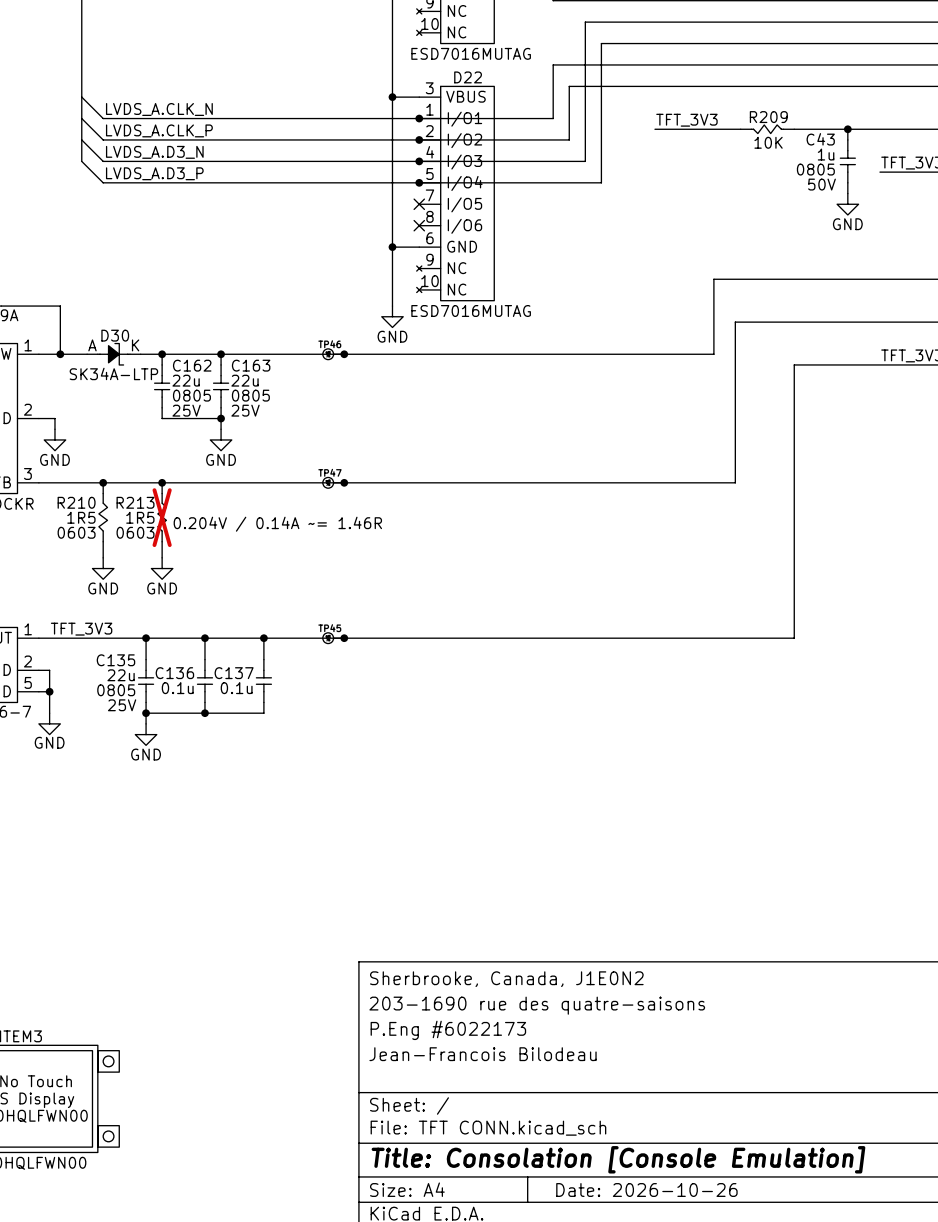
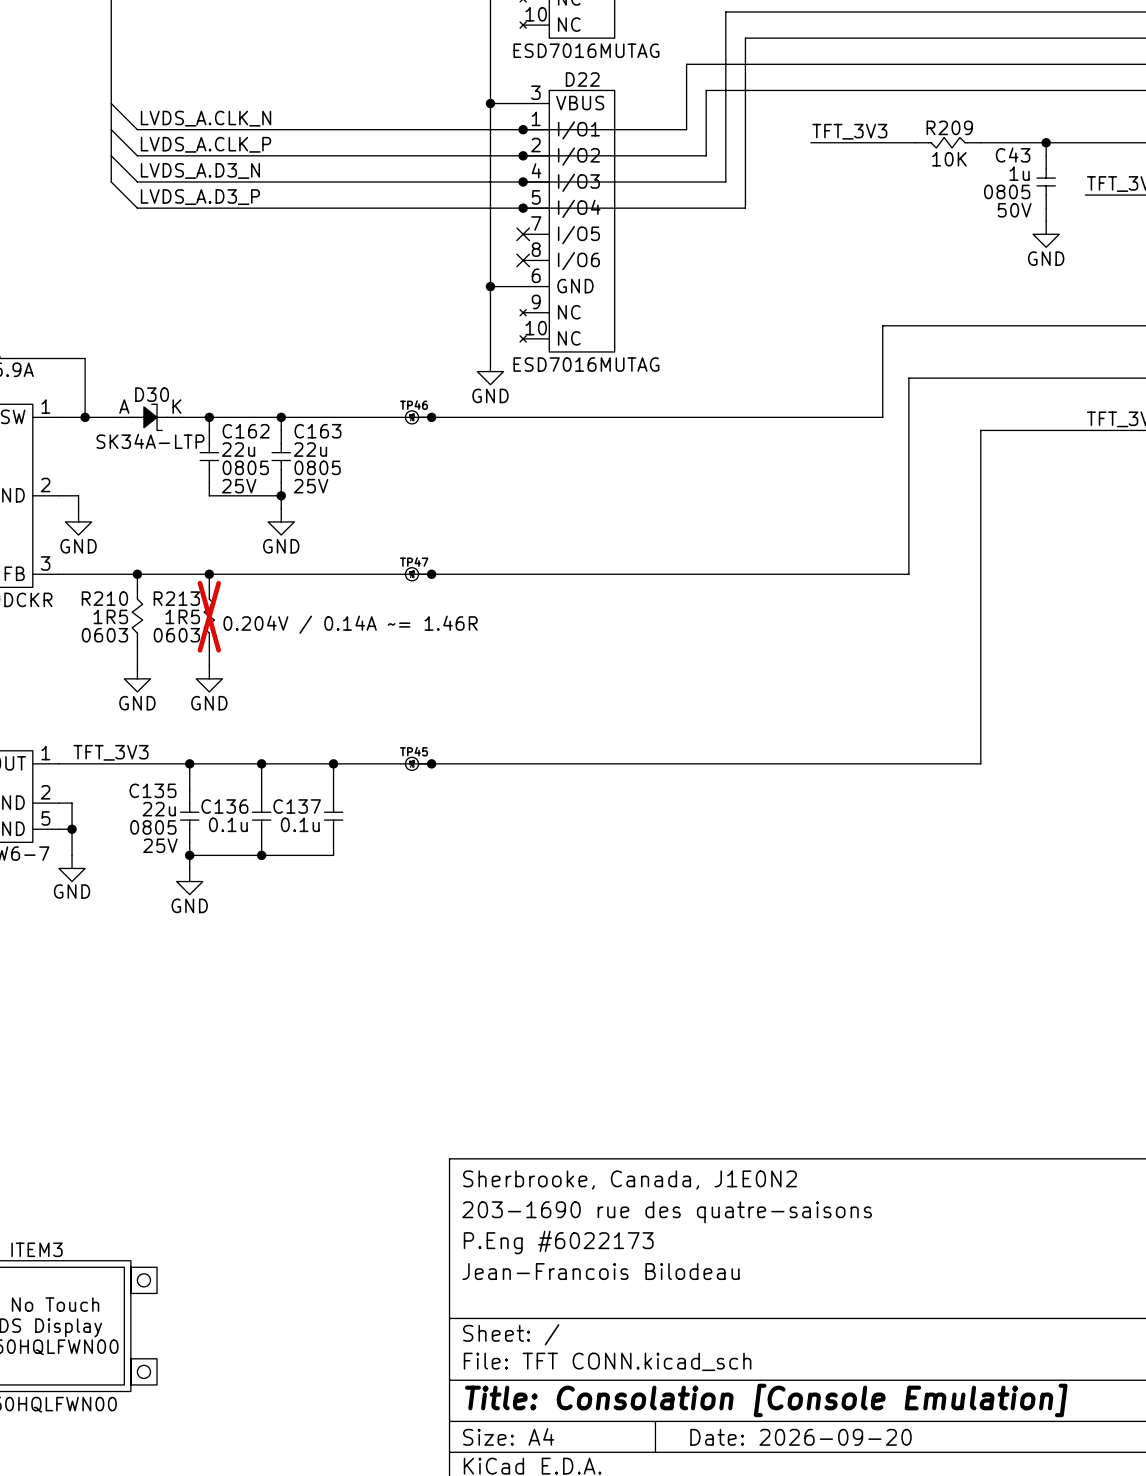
title block: Date: 2026-10-26 (646, 1190) -> Date: 2026-09-20 (800, 1437)

